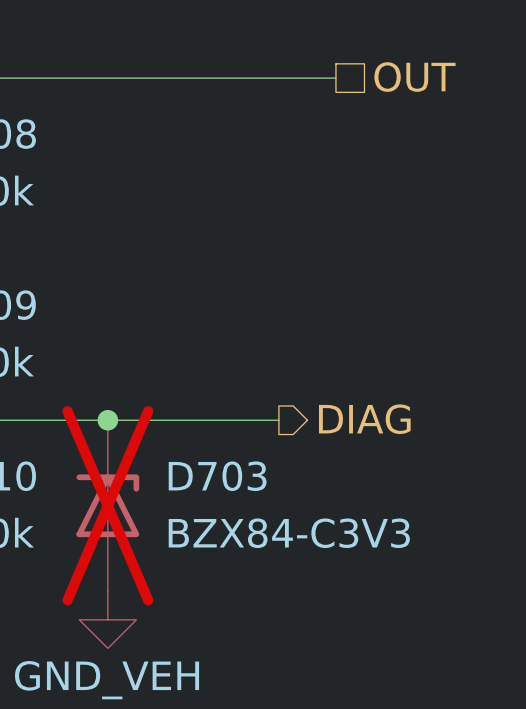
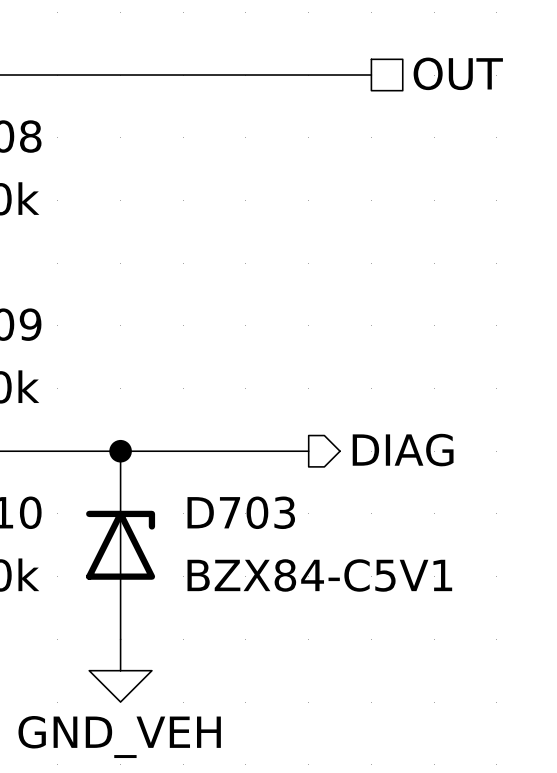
D703 do-not-place cross: (107, 505) -> none
D703 value: BZX84-C3V3 (289, 533) -> BZX84-C5V1 (319, 575)

